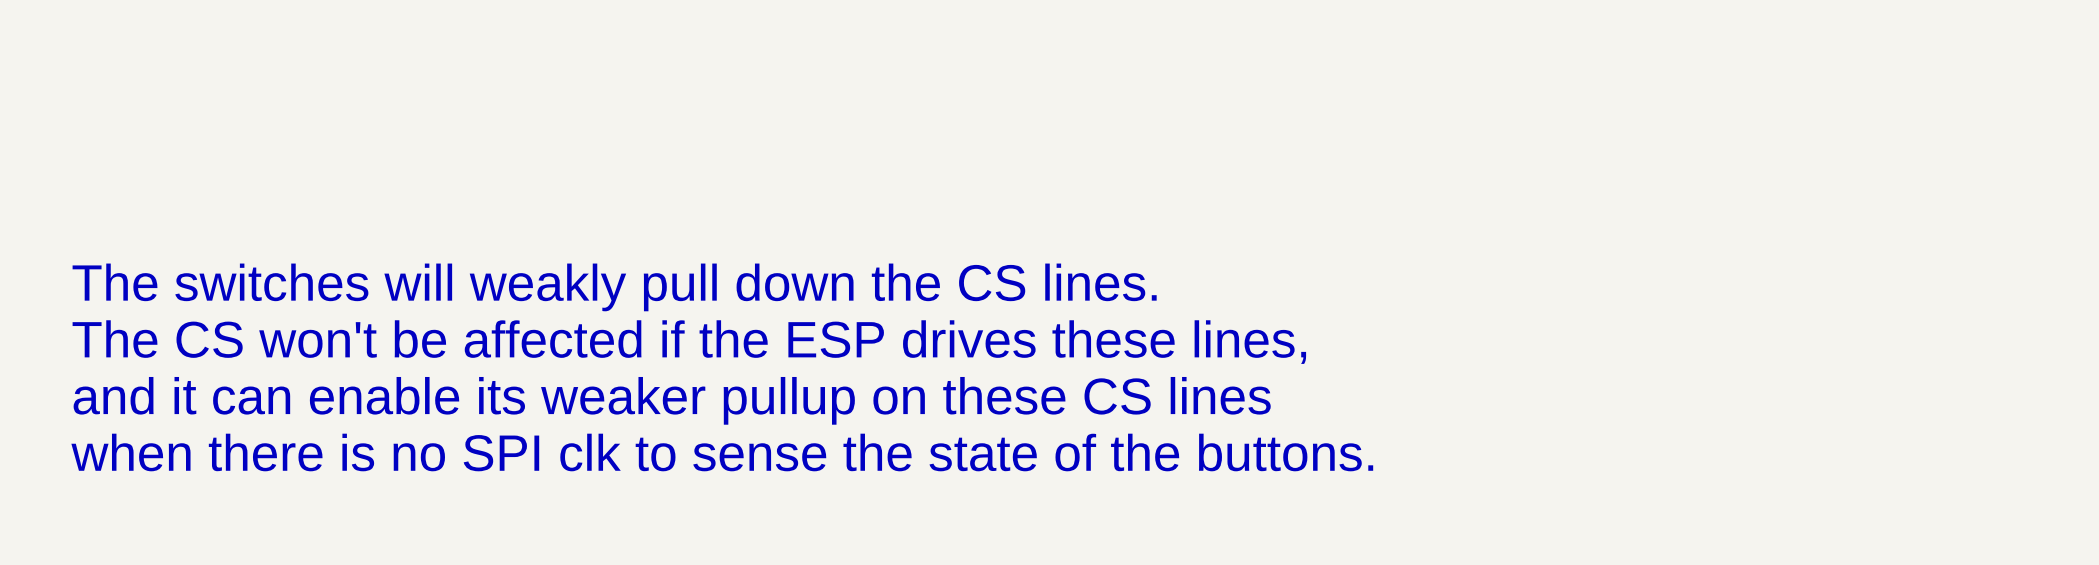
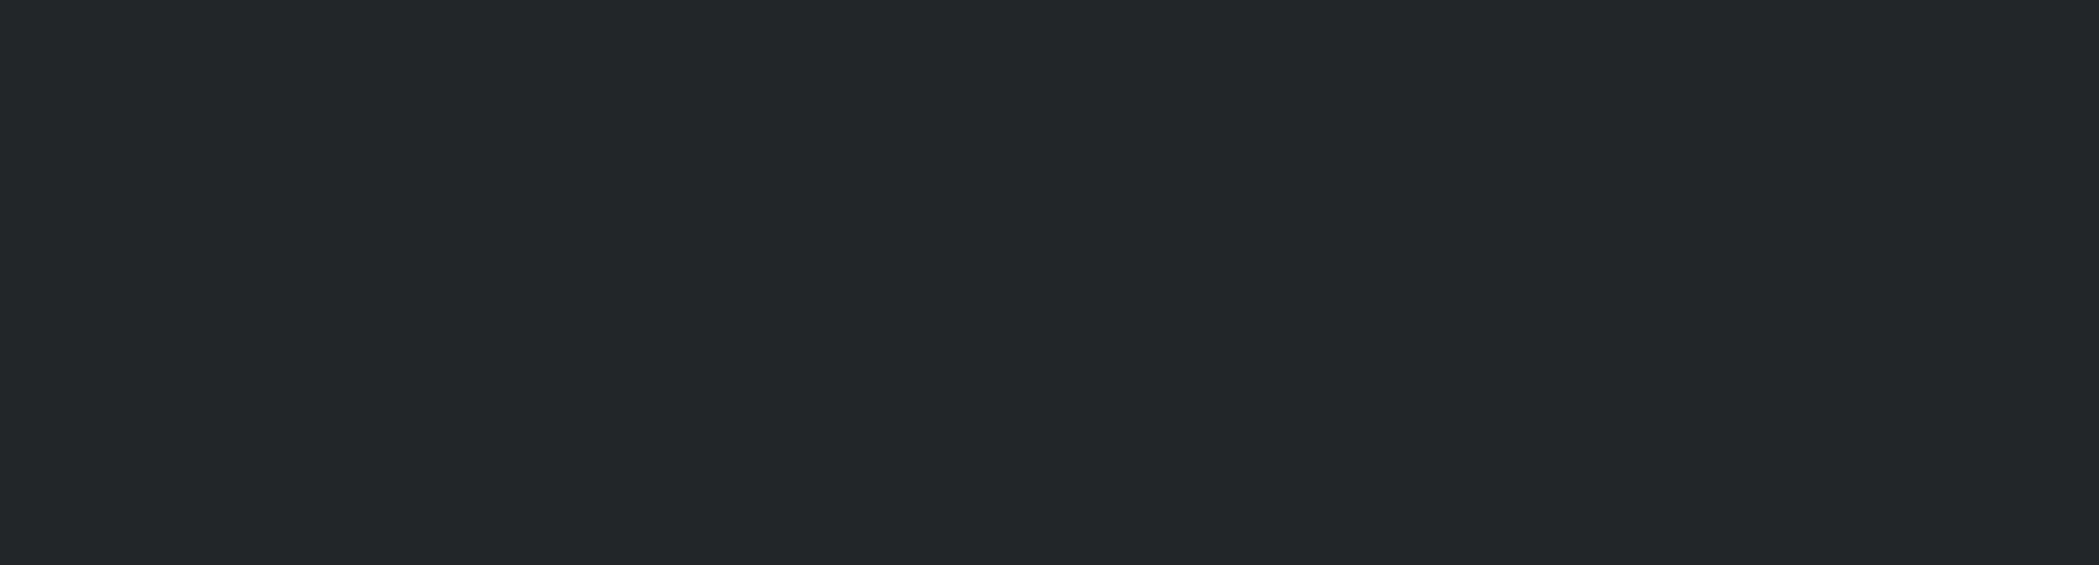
text: The switches will weakly pull down the CS lines. (614, 287) -> none
text: The CS won't be affected if the ESP drives these lines, (689, 342) -> none
text: and it can enable its weaker pullup on these CS lines (672, 400) -> none
text: when there is no SPI clk to sense the state of the buttons. (722, 452) -> none

